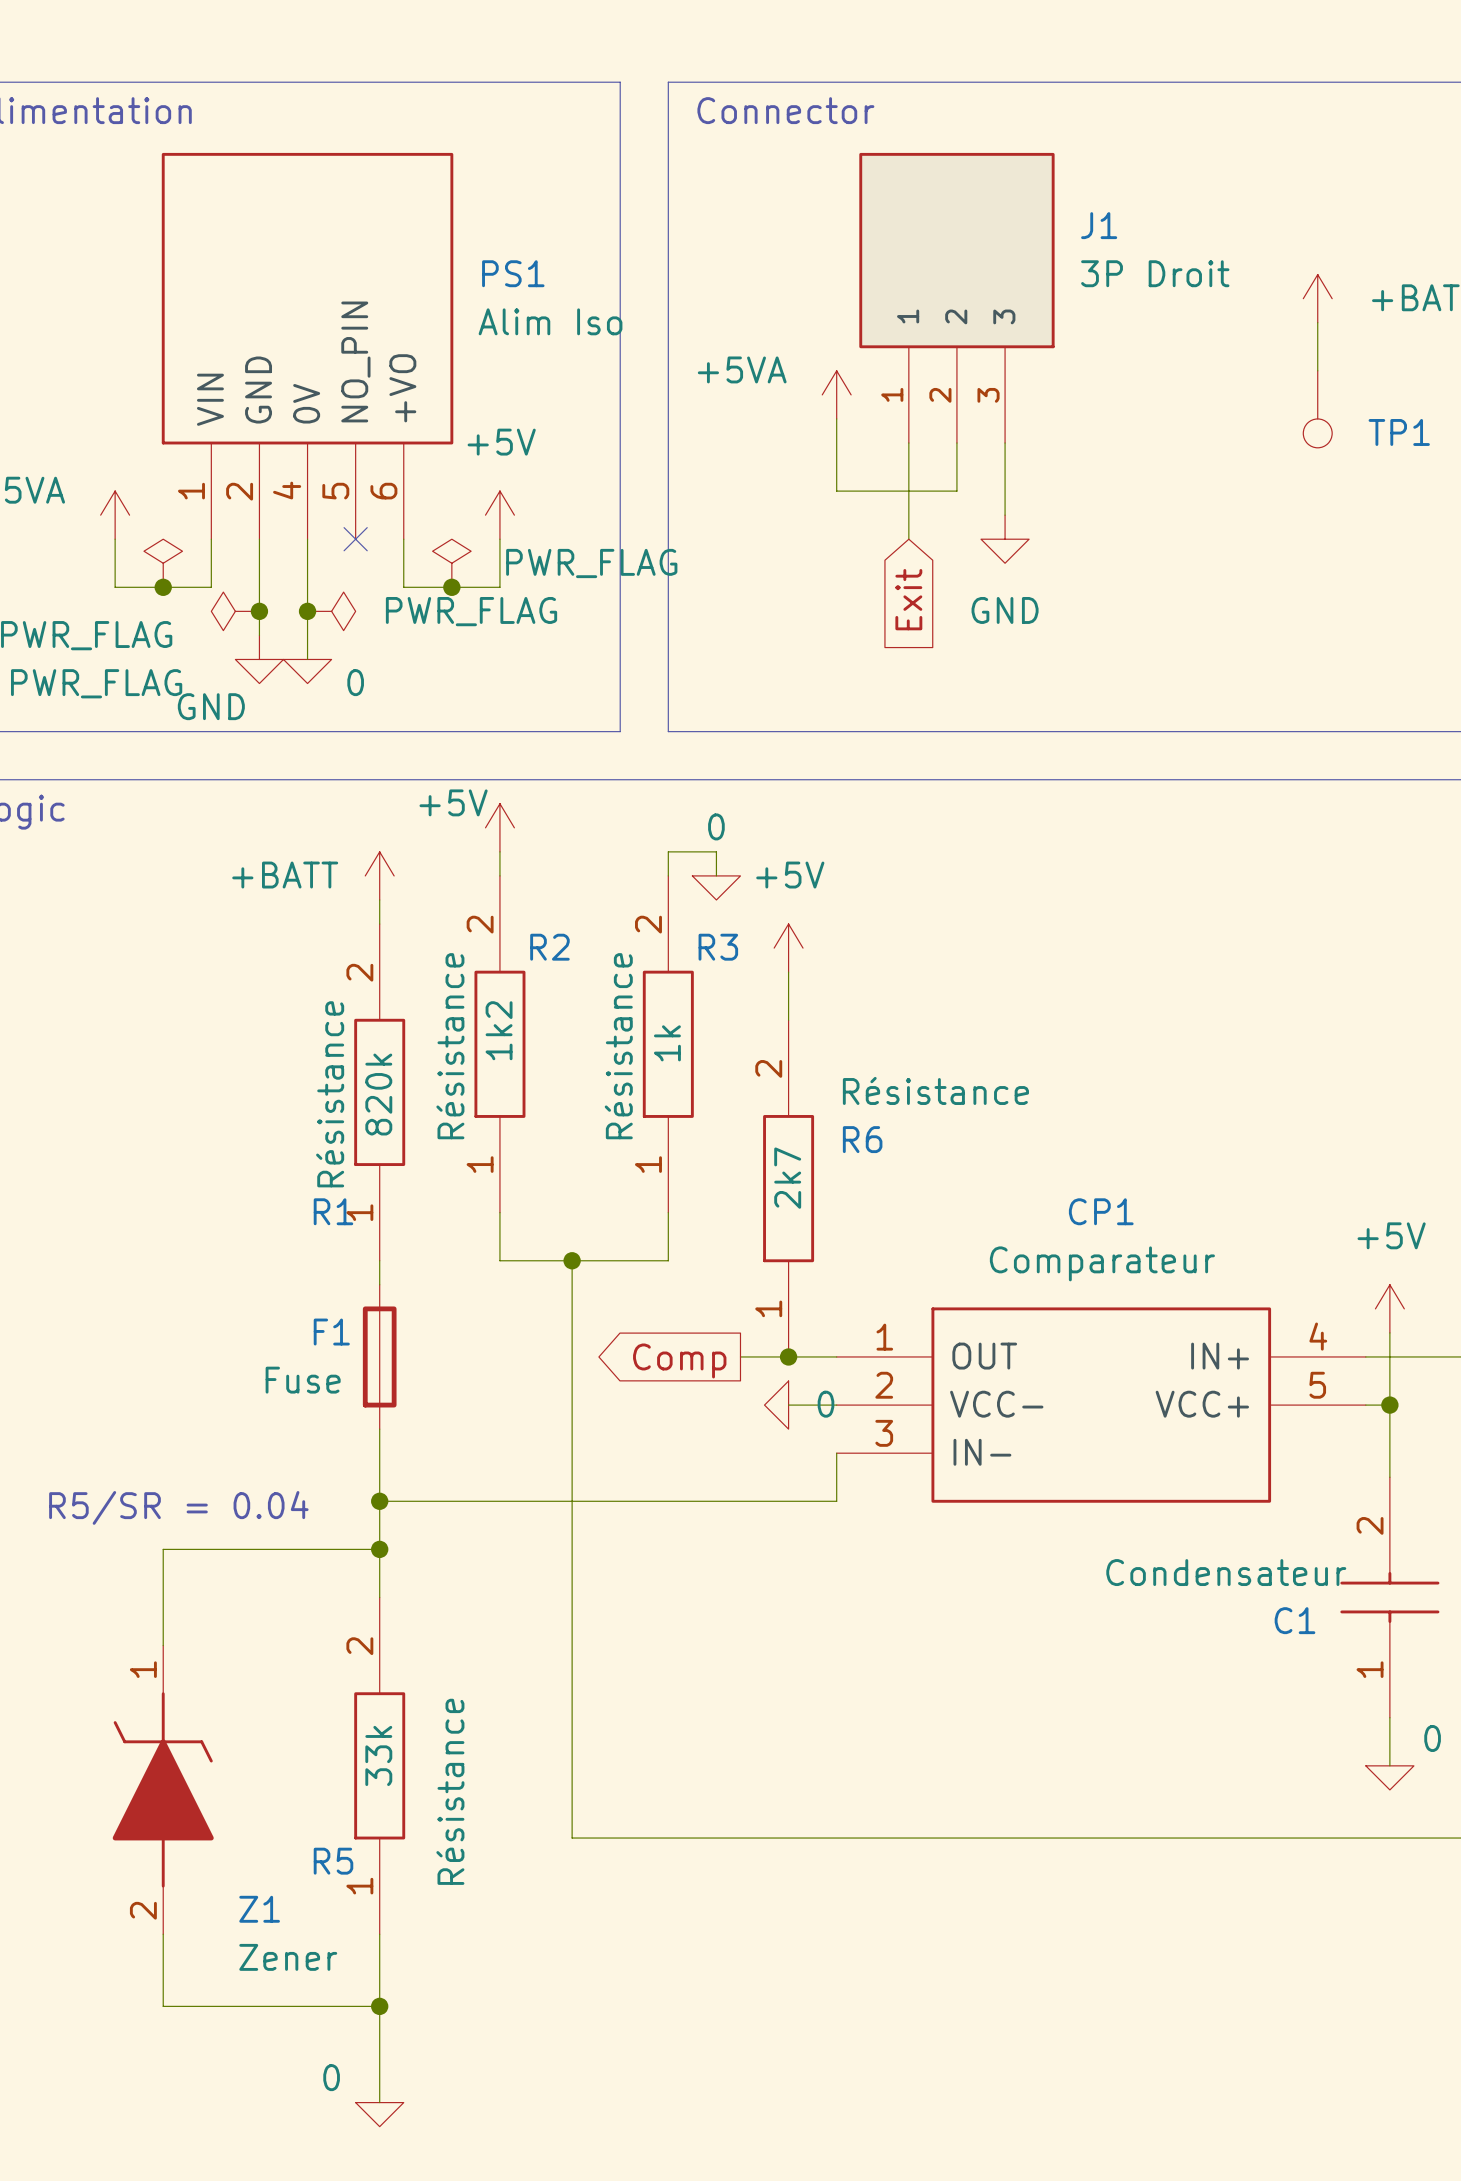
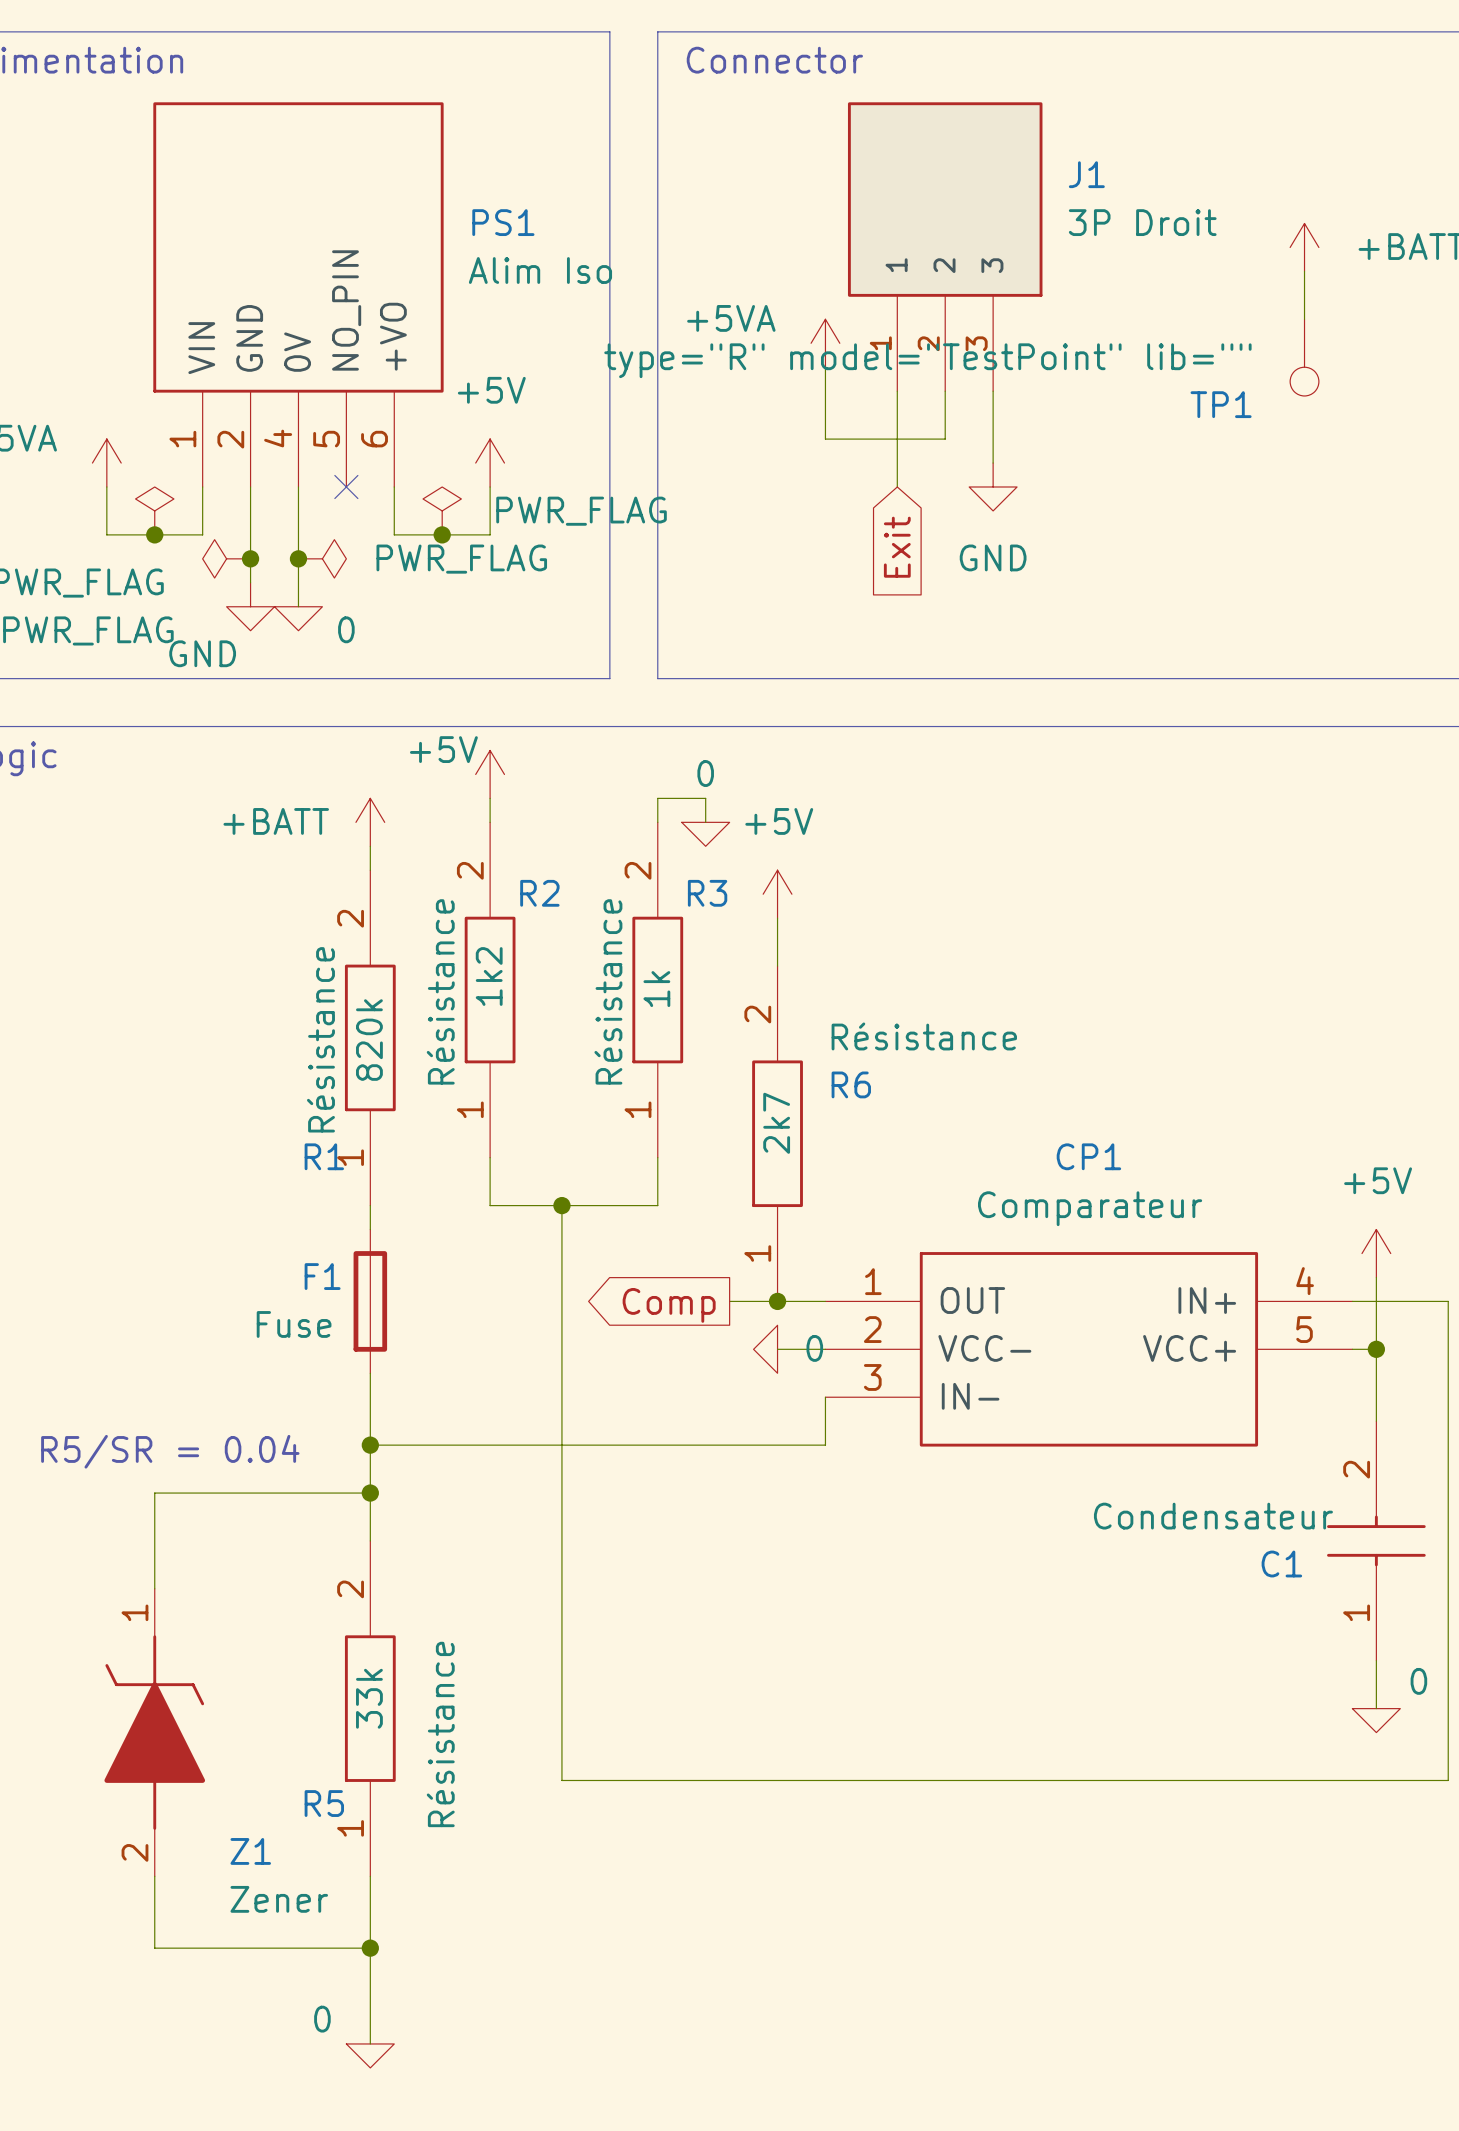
TP1 value: none -> type="R" model="TestPoint" lib="" (927, 360)
TP1 name position: TP1 (1399, 432) -> TP1 (1221, 404)

